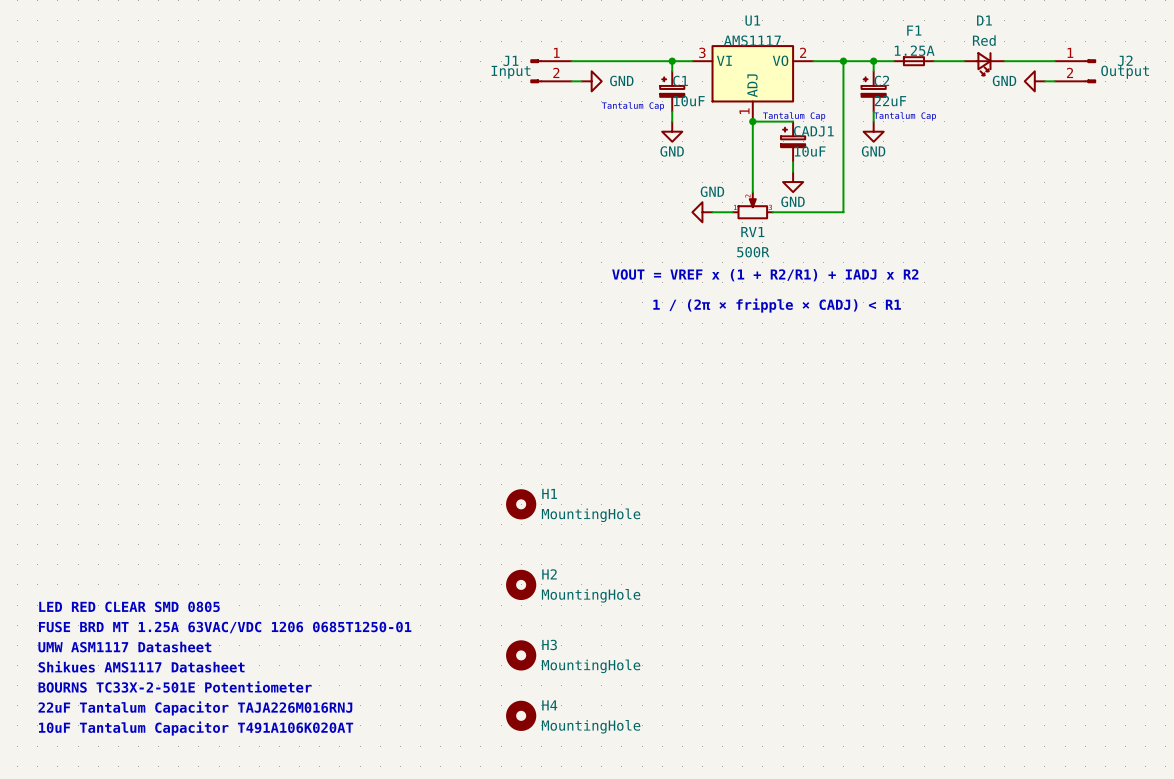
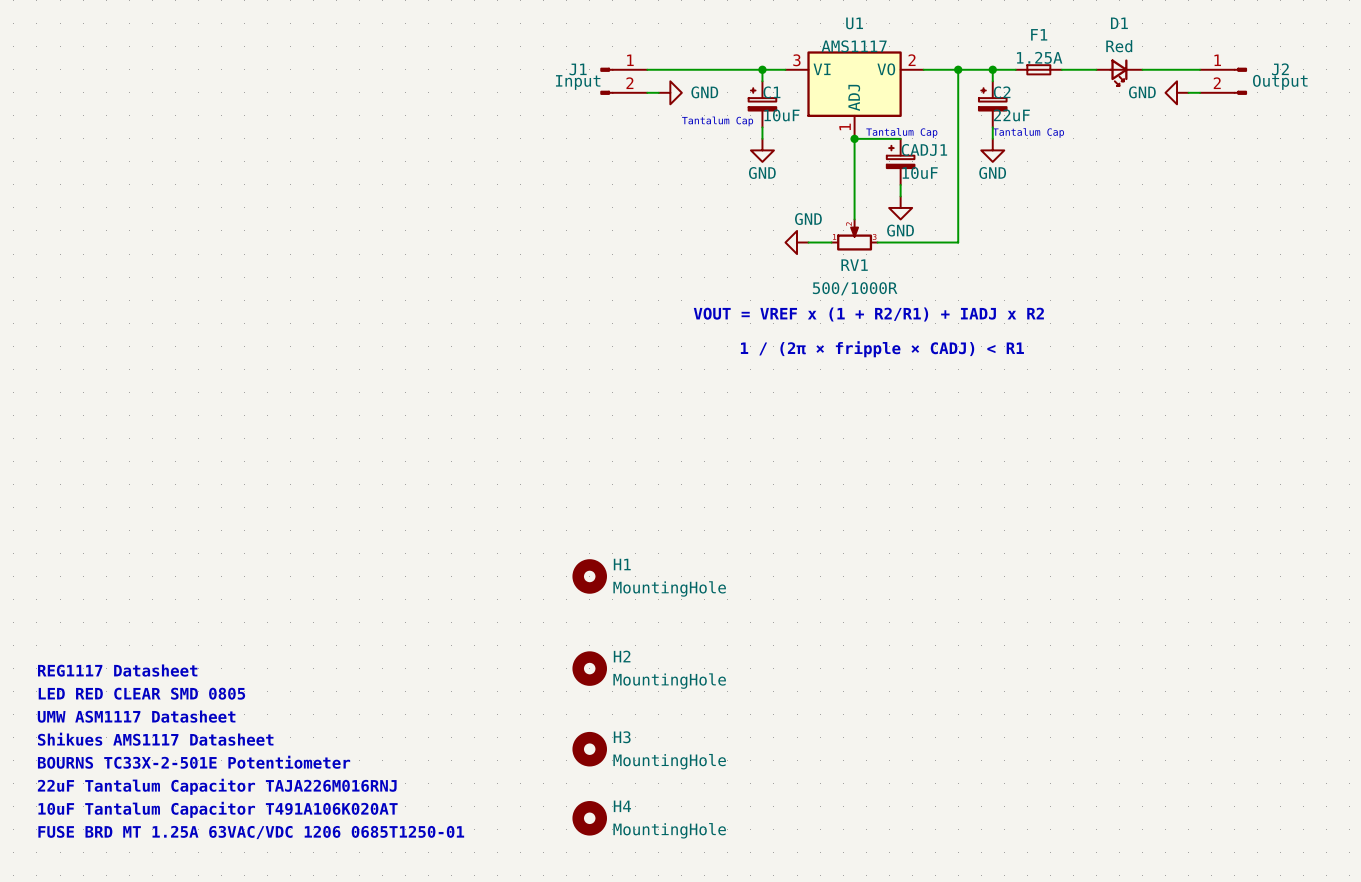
RV1 value: 500R (753, 252) -> 500/1000R (855, 288)
text: none -> REG1117 Datasheet (117, 670)
text: FUSE BRD MT 1.25A 63VAC/VDC 1206 0685T1250-01 (225, 627) -> UMW ASM1117 Datasheet (136, 716)
text: UMW ASM1117 Datasheet (124, 647) -> Shikues AMS1117 Datasheet (155, 739)
text: Shikues AMS1117 Datasheet (141, 666) -> BOURNS TC33X-2-501E Potentiometer (194, 762)
text: BOURNS TC33X-2-501E Potentiometer (175, 686) -> 22uF Tantalum Capacitor TAJA226M016RNJ (217, 786)
text: 22uF Tantalum Capacitor TAJA226M016RNJ (195, 708) -> 10uF Tantalum Capacitor T491A106K020AT (218, 809)
text: 10uF Tantalum Capacitor T491A106K020AT (196, 728) -> FUSE BRD MT 1.25A 63VAC/VDC 1206 0685T1250-01 (251, 832)

